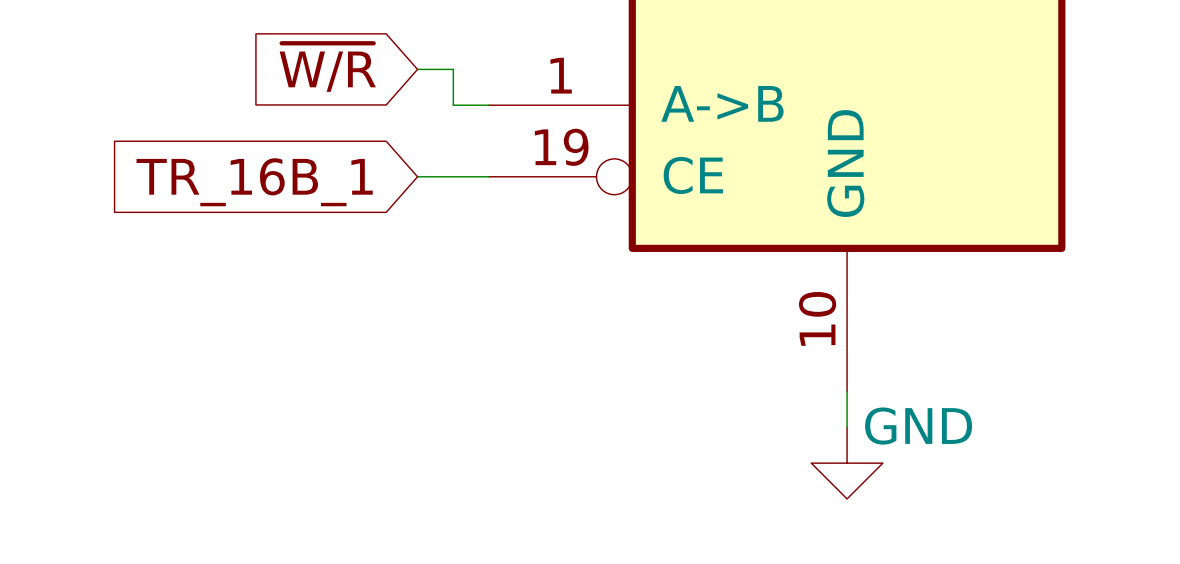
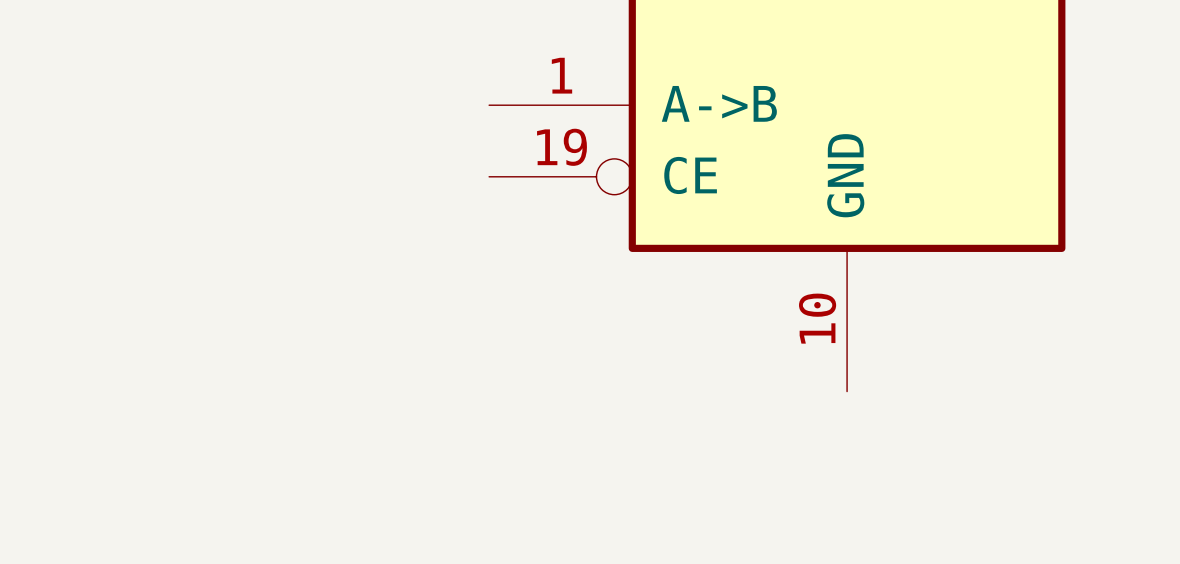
global label: ~{W/R} (327, 67) -> none
wire: (417, 69) (453, 69) (453, 105) (489, 105) -> none
wire: (417, 176) (489, 176) -> none
global label: TR_16B_1 (254, 182) -> none
wire: (847, 391) (847, 427) -> none
power symbol: GND (847, 463) -> none

